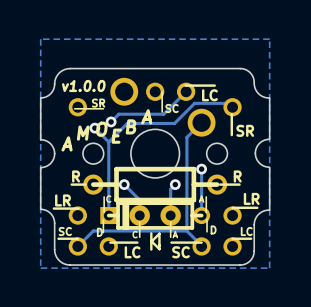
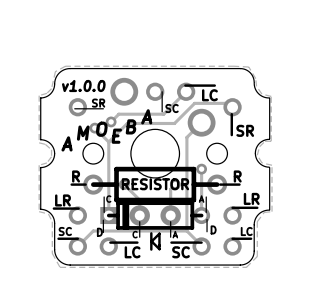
zone outline: (269, 39) (40, 39) (40, 268) (269, 268) (269, 39) -> (234, 66) (248, 67) (261, 94) (271, 96) (271, 141) (265, 141) (259, 146) (257, 155) (261, 162) (272, 165) (272, 211) (264, 212) (257, 221) (257, 256) (246, 267) (60, 267) (52, 253) (52, 221) (48, 213) (39, 211) (39, 165) (46, 162) (51, 156) (51, 149) (45, 144) (39, 142) (39, 95) (46, 93) (51, 88) (55, 71) (65, 66) (234, 66)
part value: none -> RESISTOR (155, 184)

